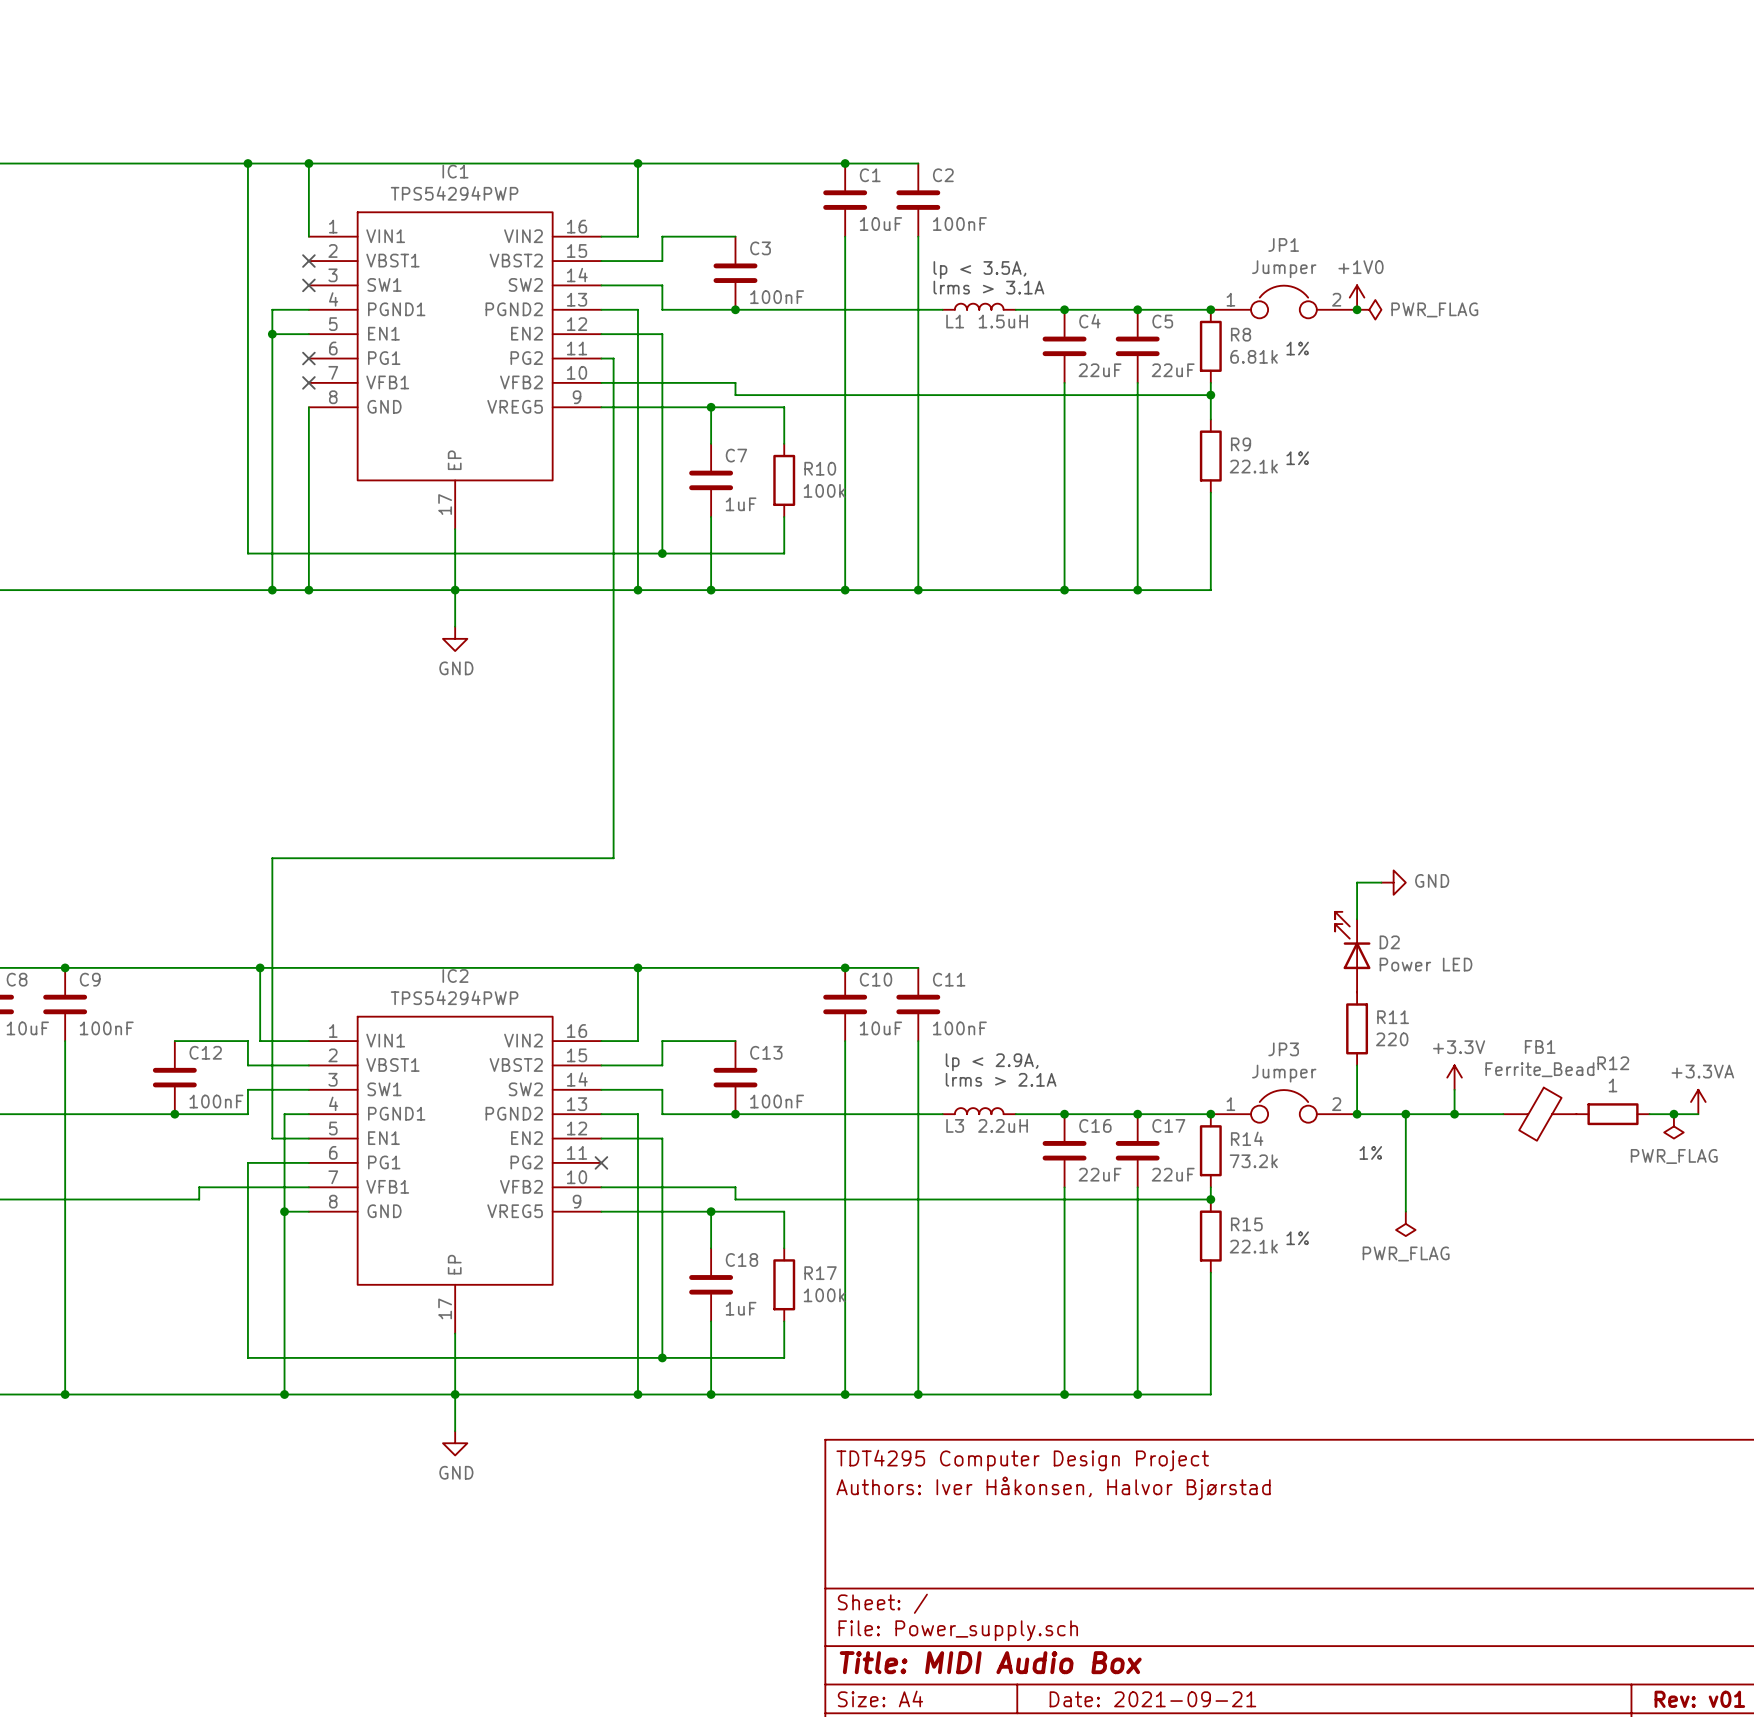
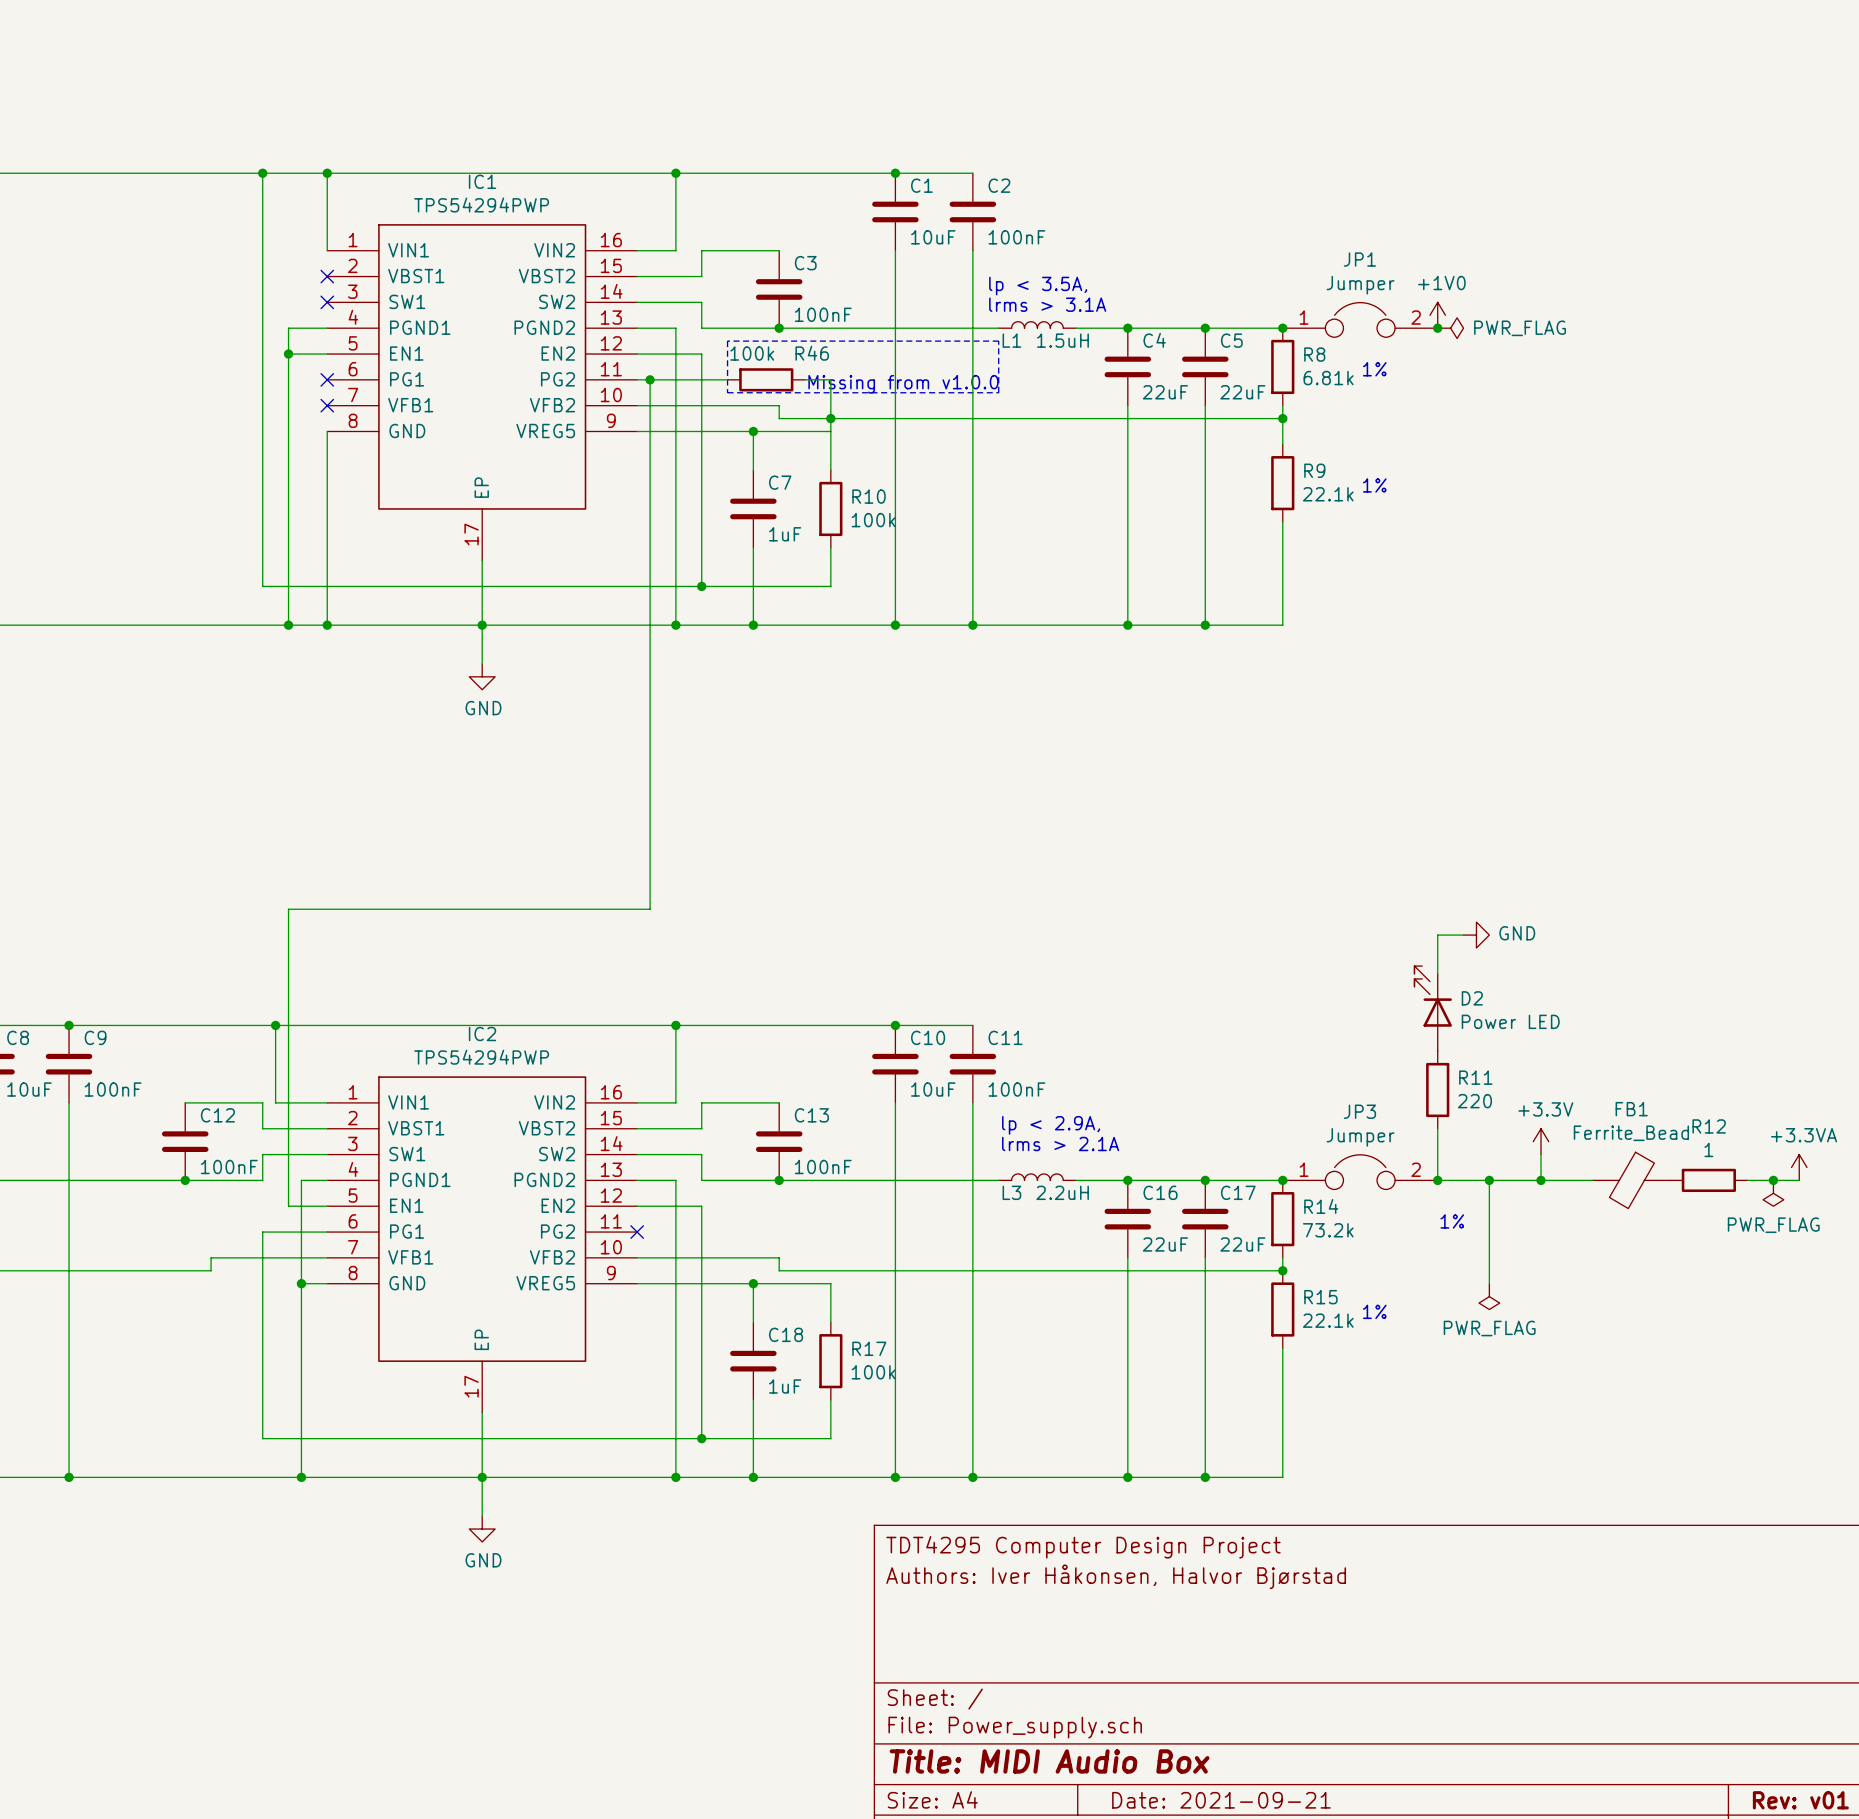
line: none -> (727, 341) (727, 392) (998, 392) (998, 341) (727, 341)
wire: none -> (650, 379) (727, 379)
junction: none -> (650, 379)
R46: none -> 100k (766, 379)
wire: none -> (805, 379) (830, 379) (830, 431)
text: none -> Missing from v1.0.0 (903, 384)
junction: none -> (830, 418)

